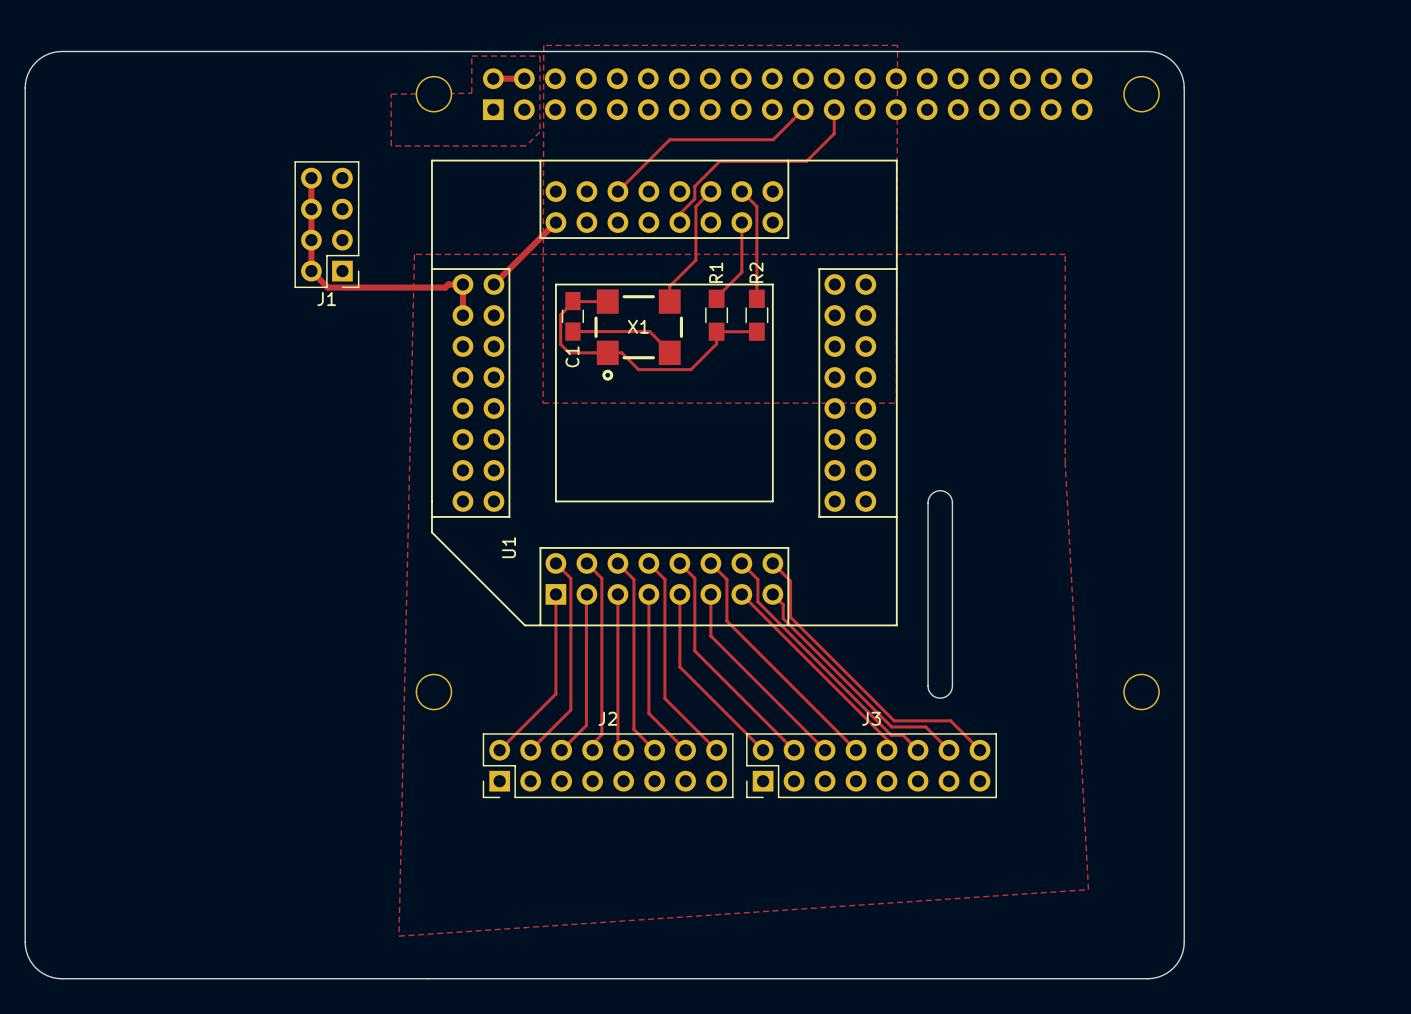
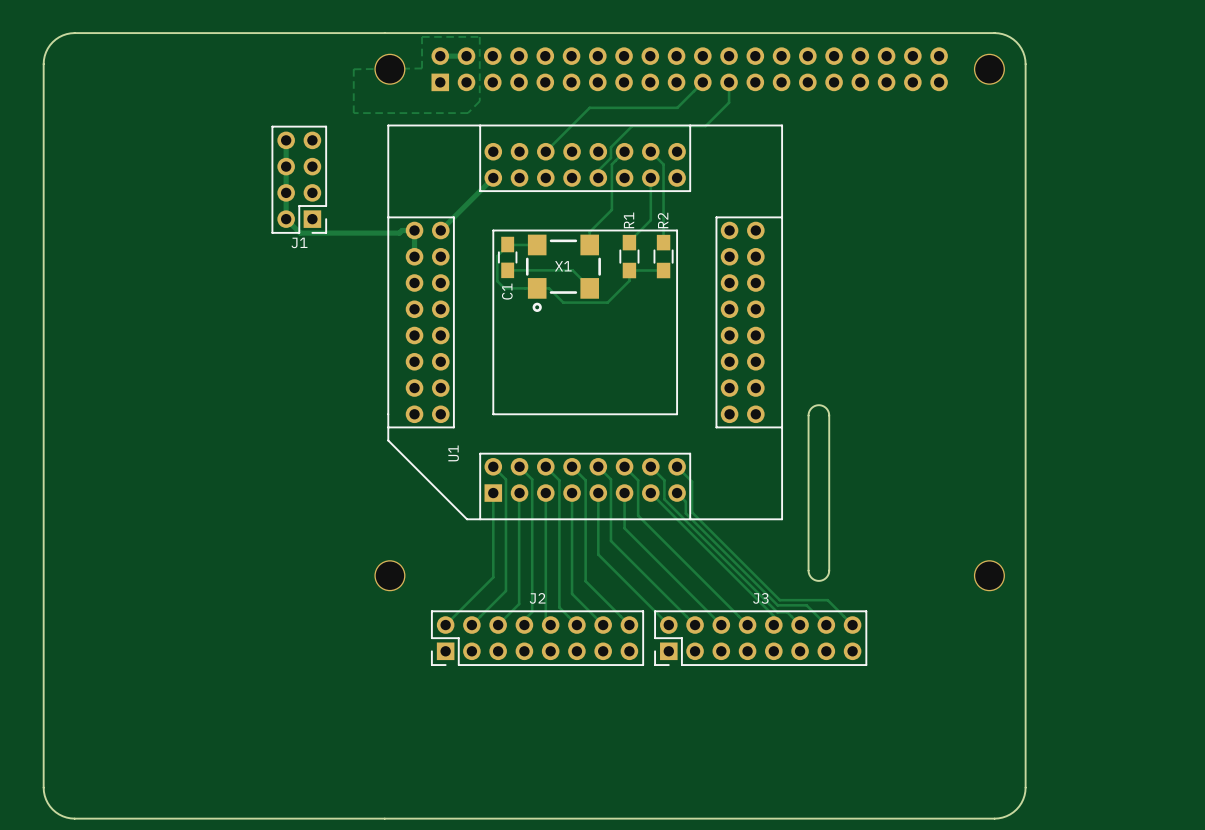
zone outline: (543, 45) (543, 403) (896, 403) (897, 45) (543, 45) -> none
zone outline: (414, 254) (1065, 254) (1065, 463) (1088, 889) (398, 936) (414, 254) -> none

